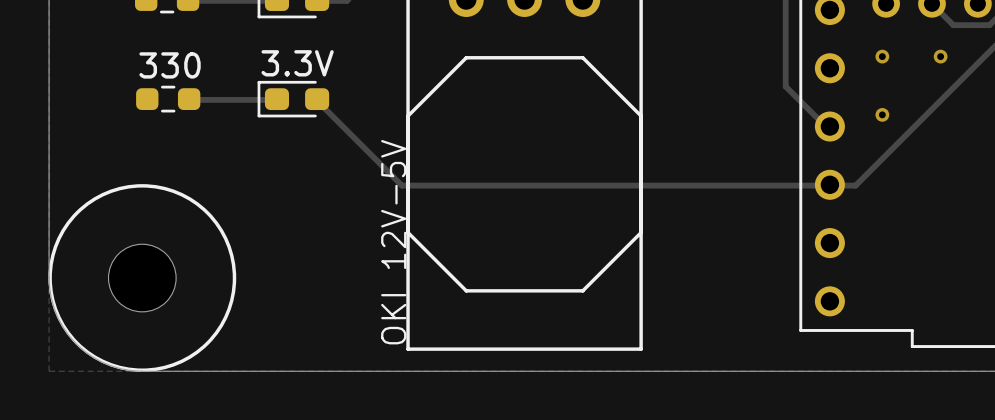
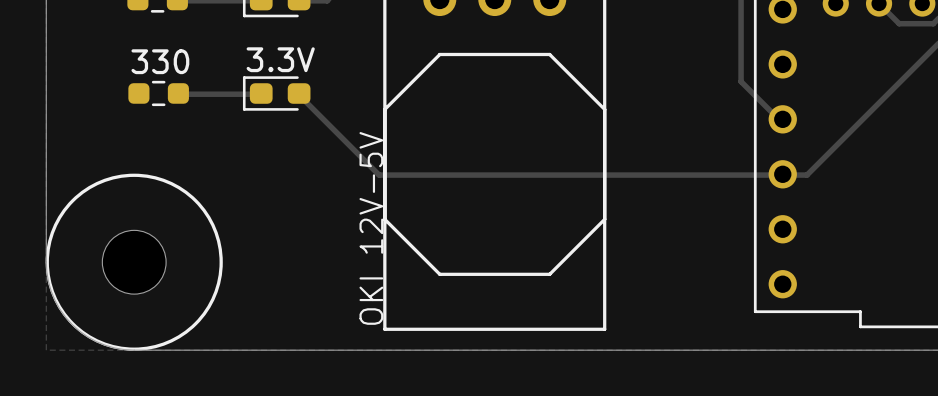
via: (882, 56) -> none
via: (940, 56) -> none
via: (882, 114) -> none

